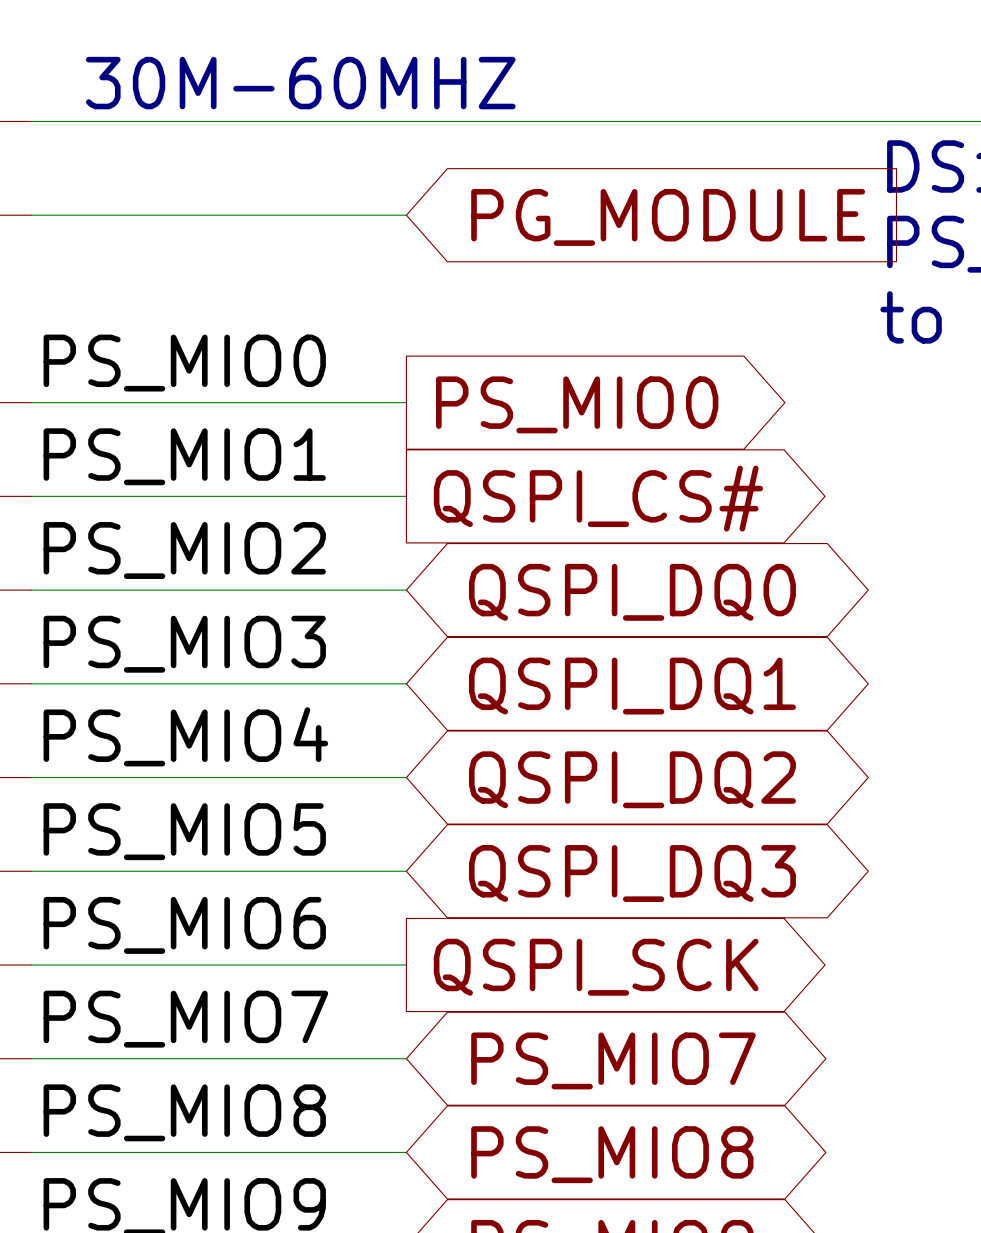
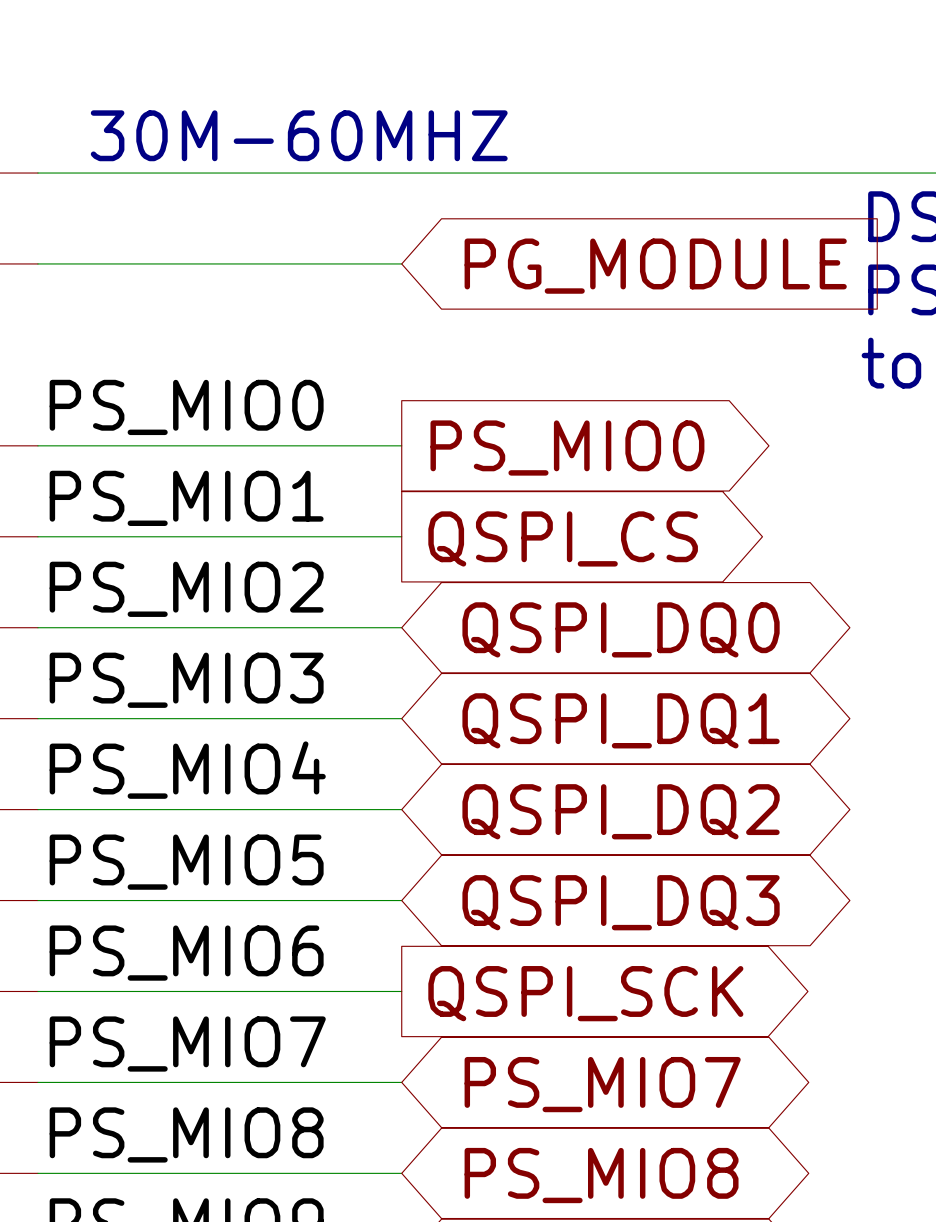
global label: QSPI_CS# (598, 498) -> QSPI_CS (563, 538)

